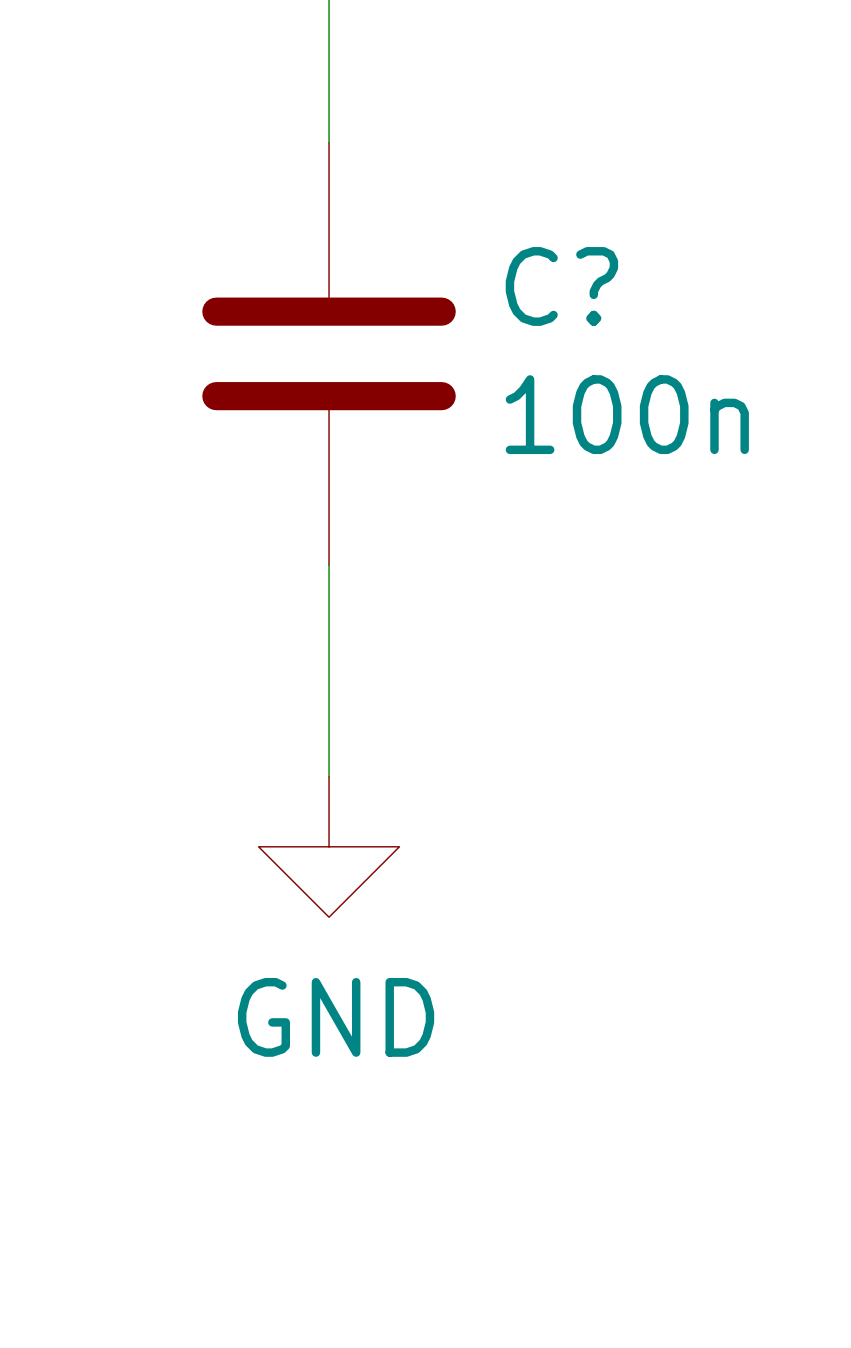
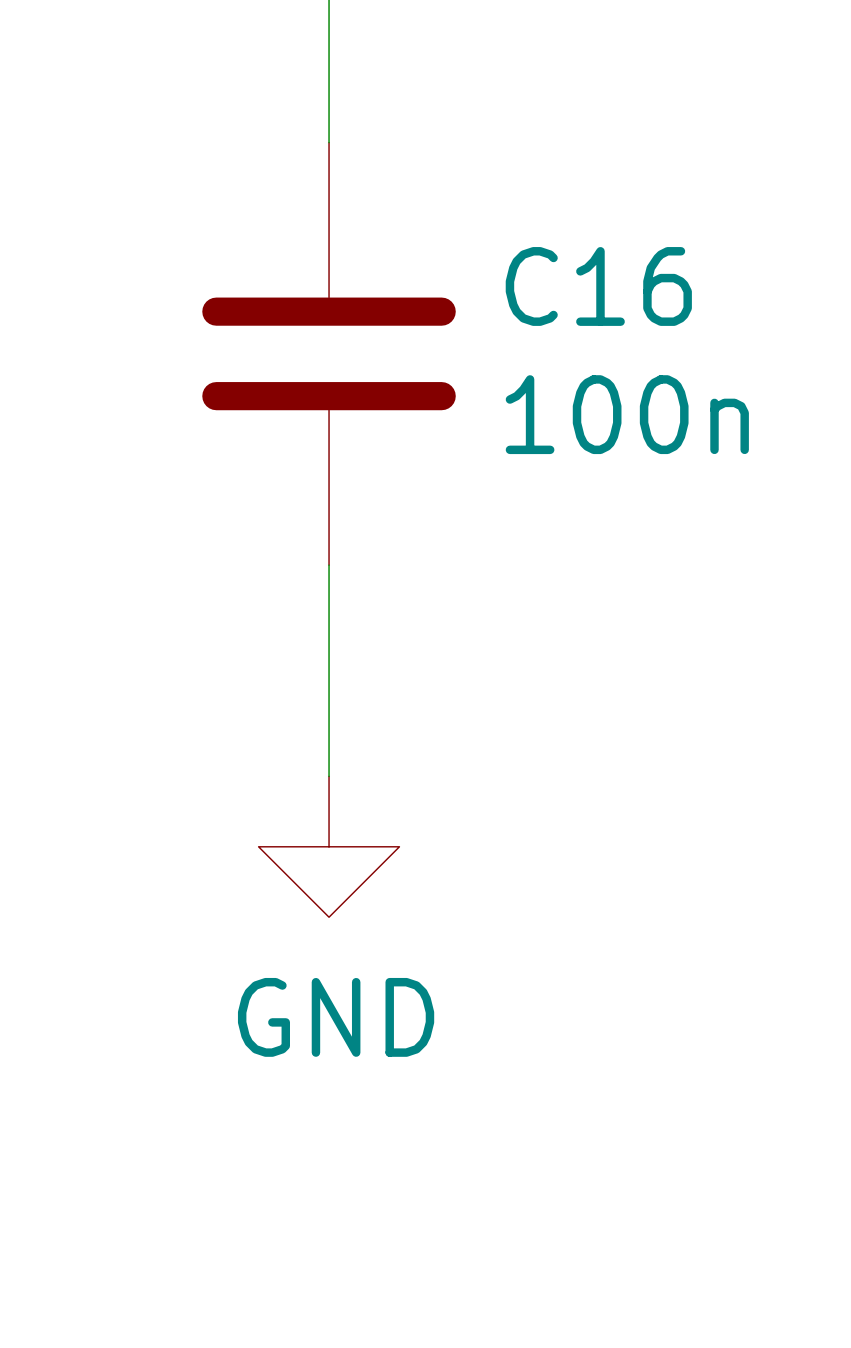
C? name: C? (561, 286) -> C16 (598, 286)

